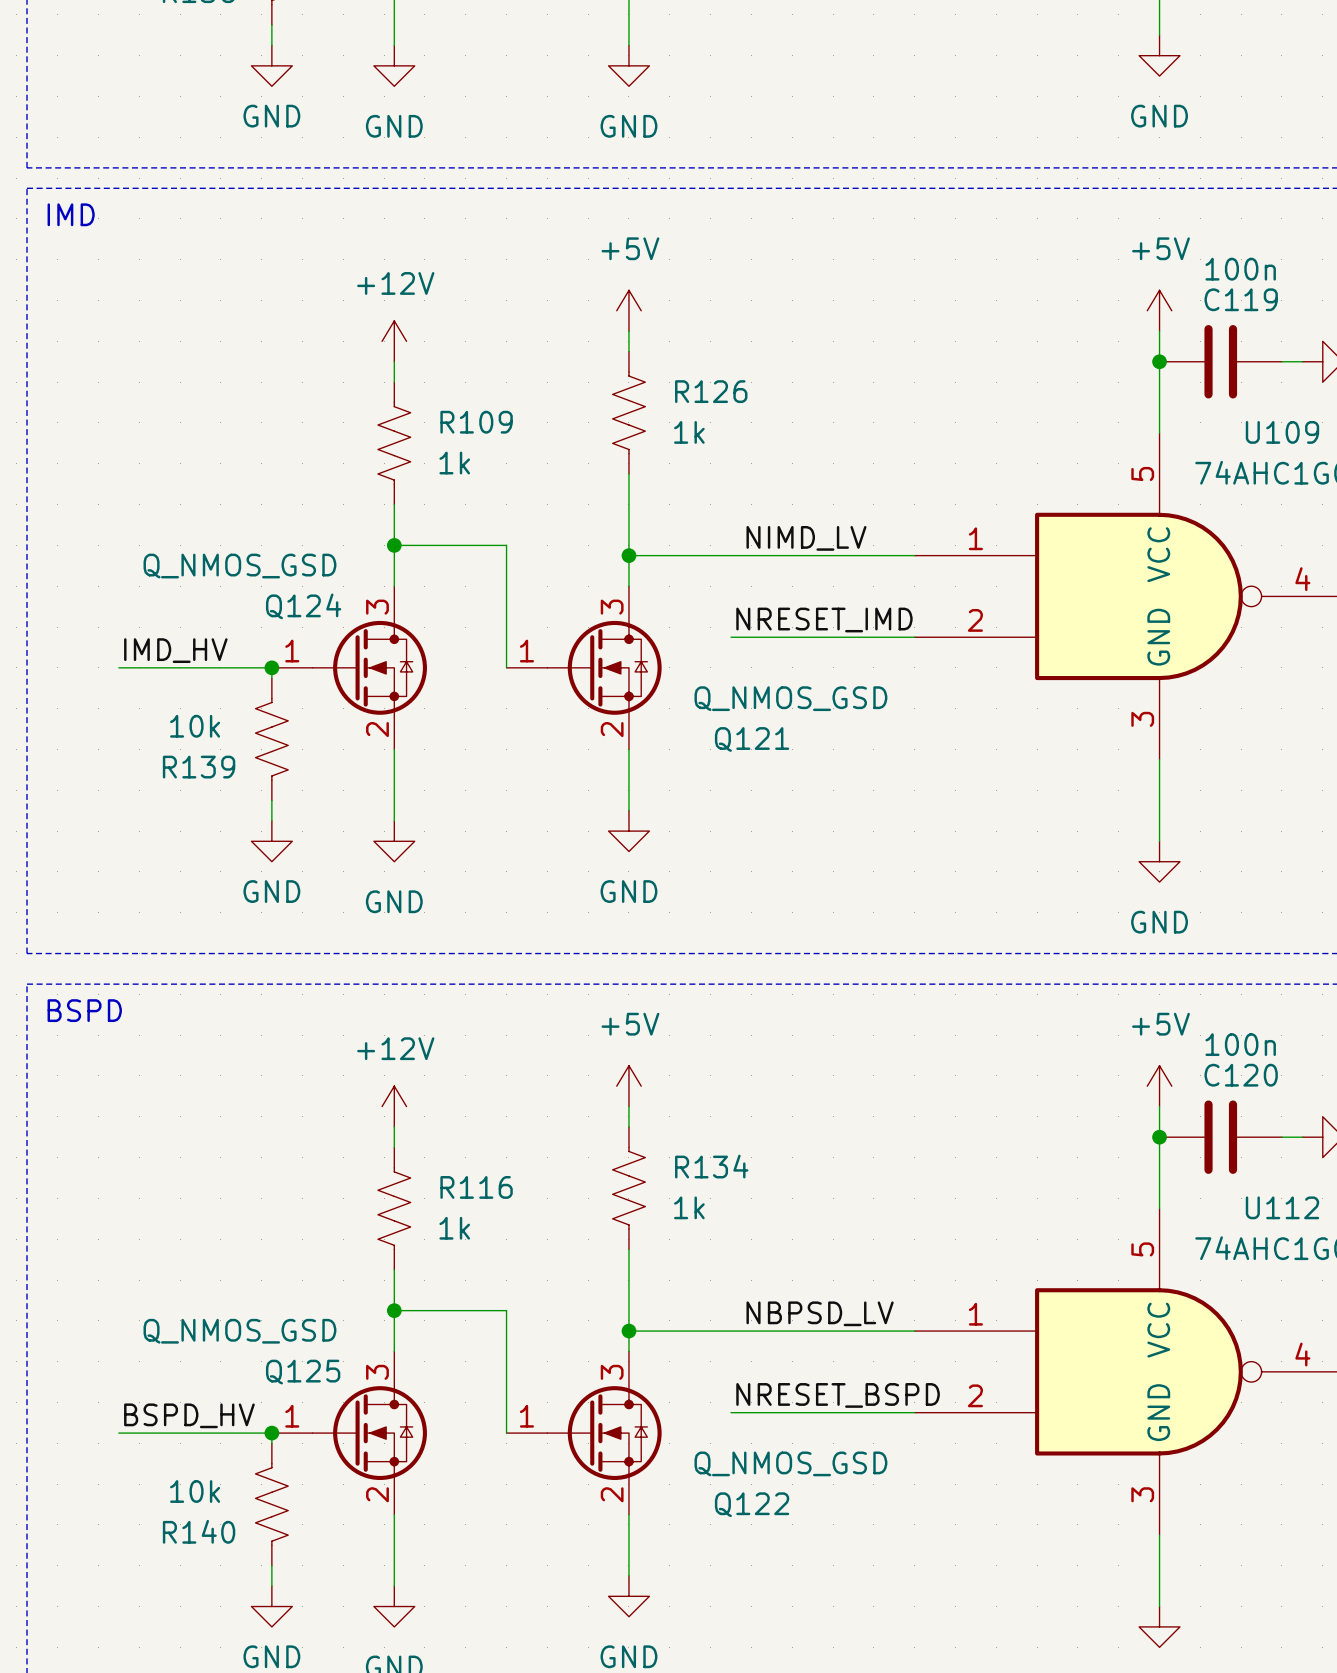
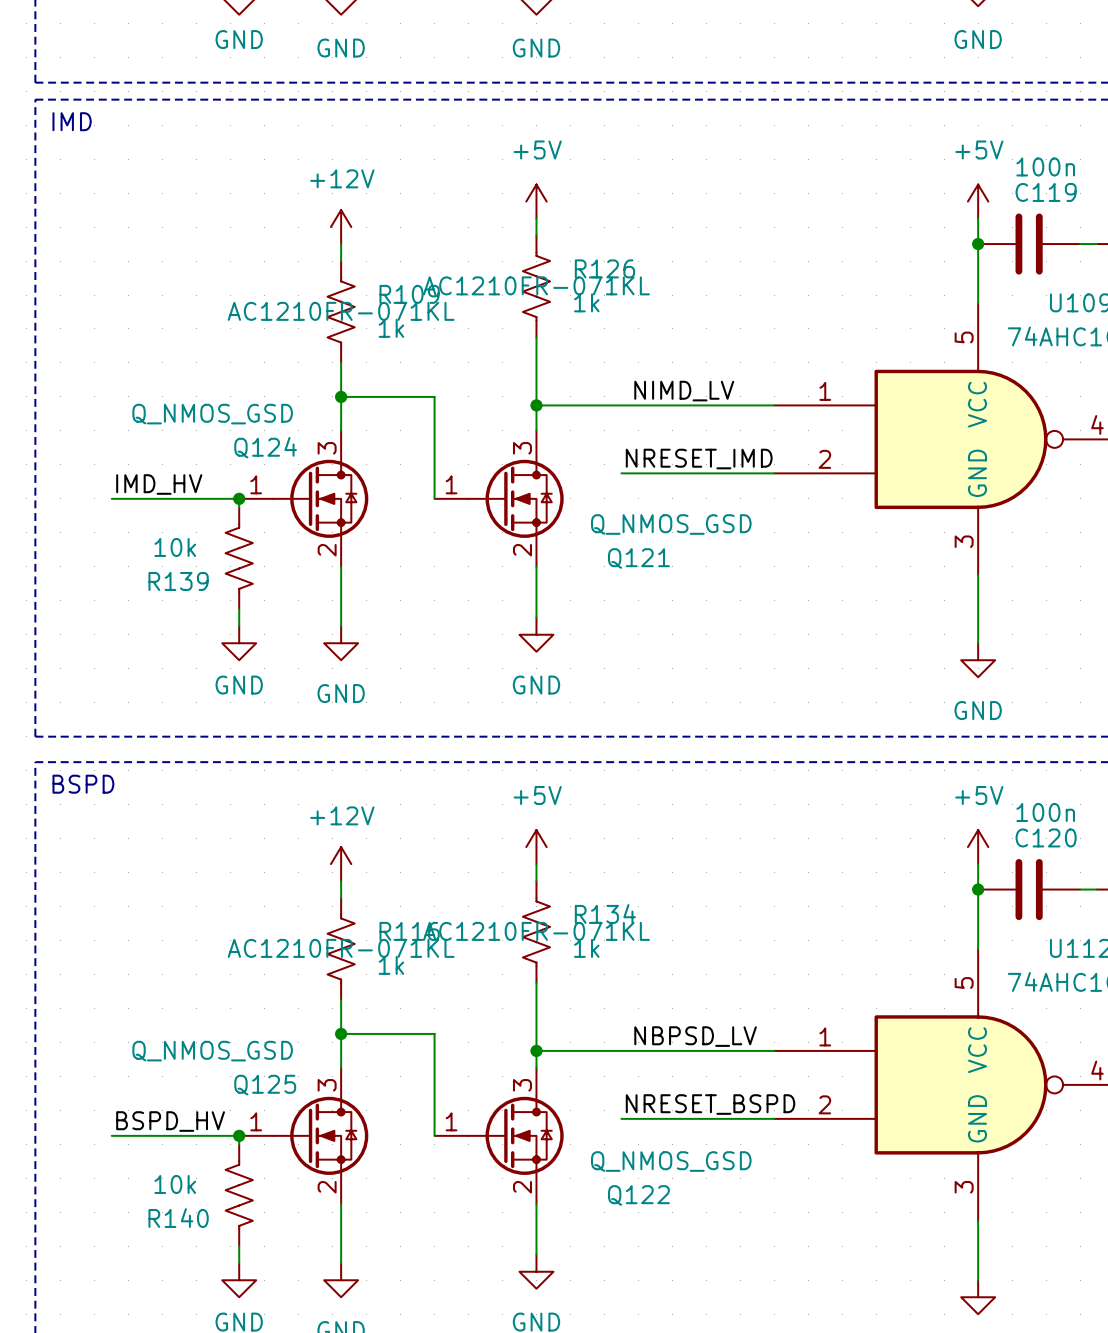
R126 text: none -> AC1210FR-071KL (536, 285)
R109 text: none -> AC1210FR-071KL (341, 311)
R134 text: none -> AC1210FR-071KL (536, 931)
R116 text: none -> AC1210FR-071KL (341, 948)

